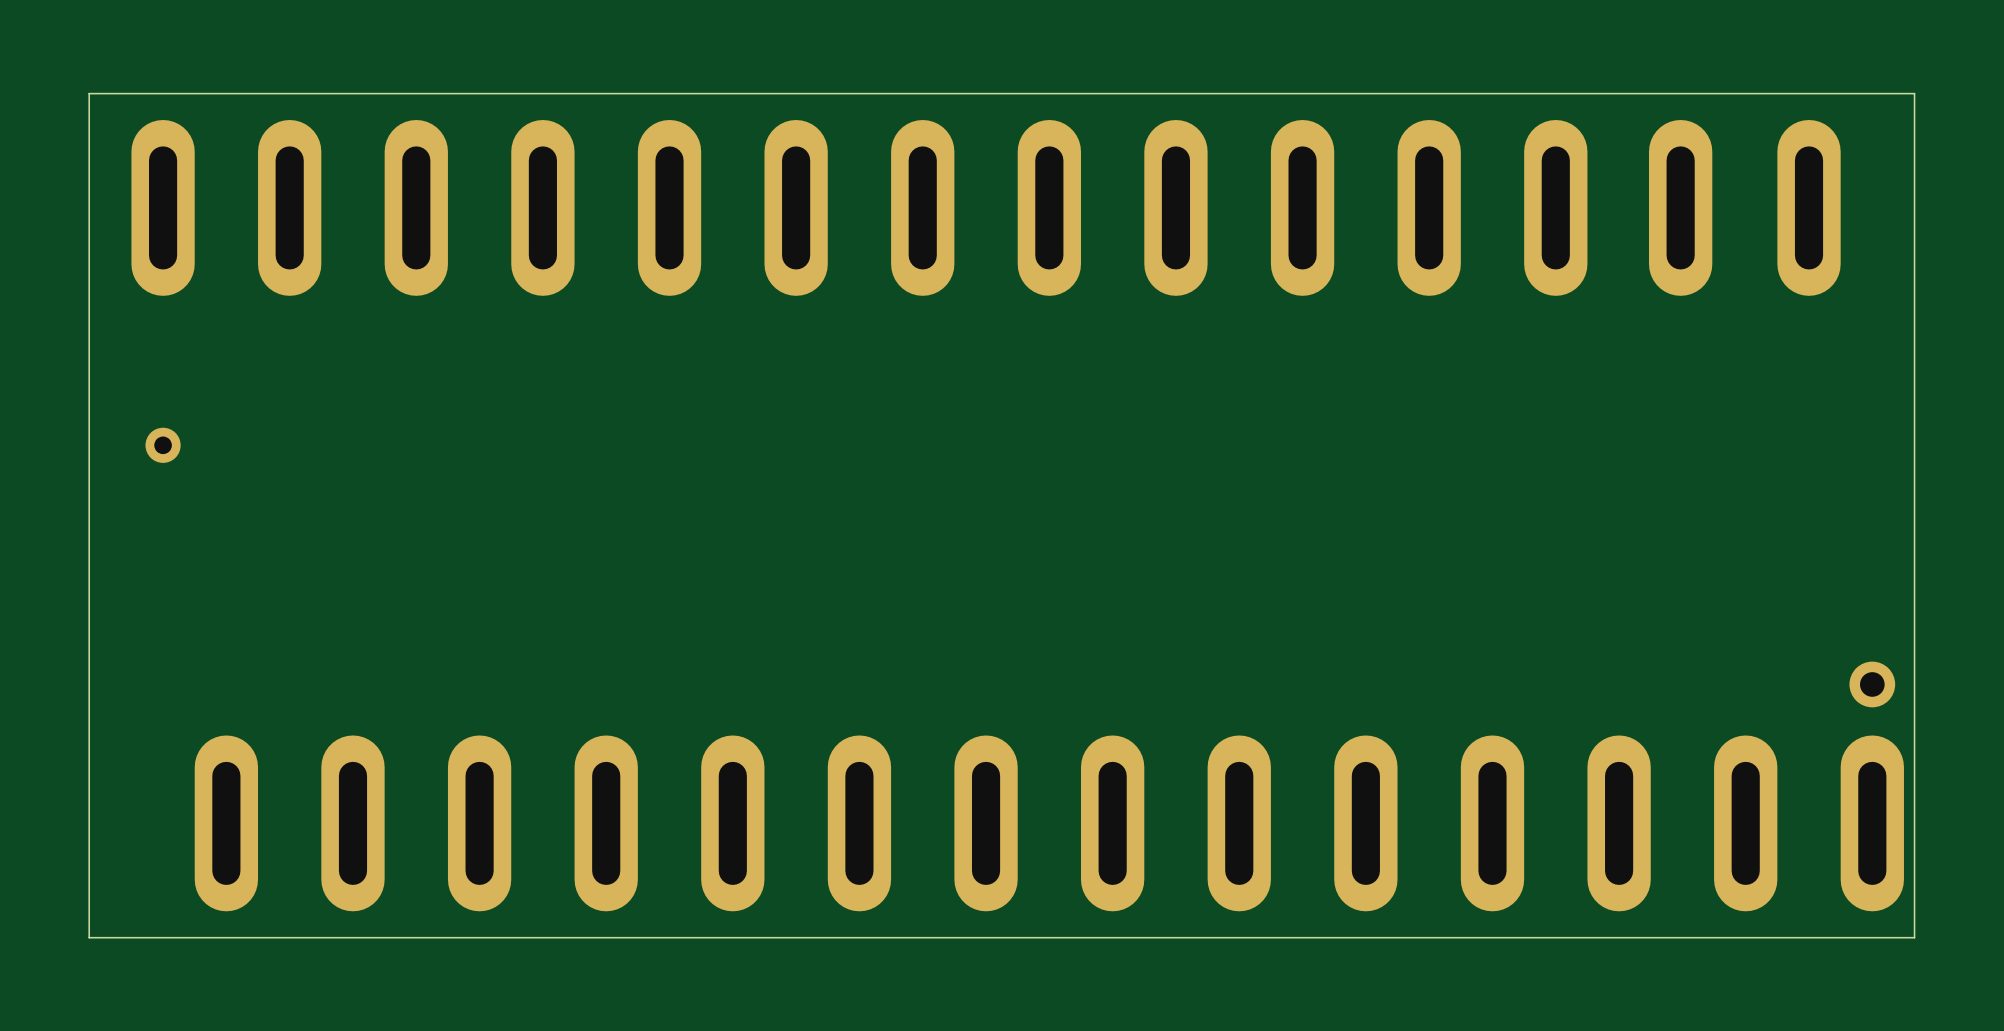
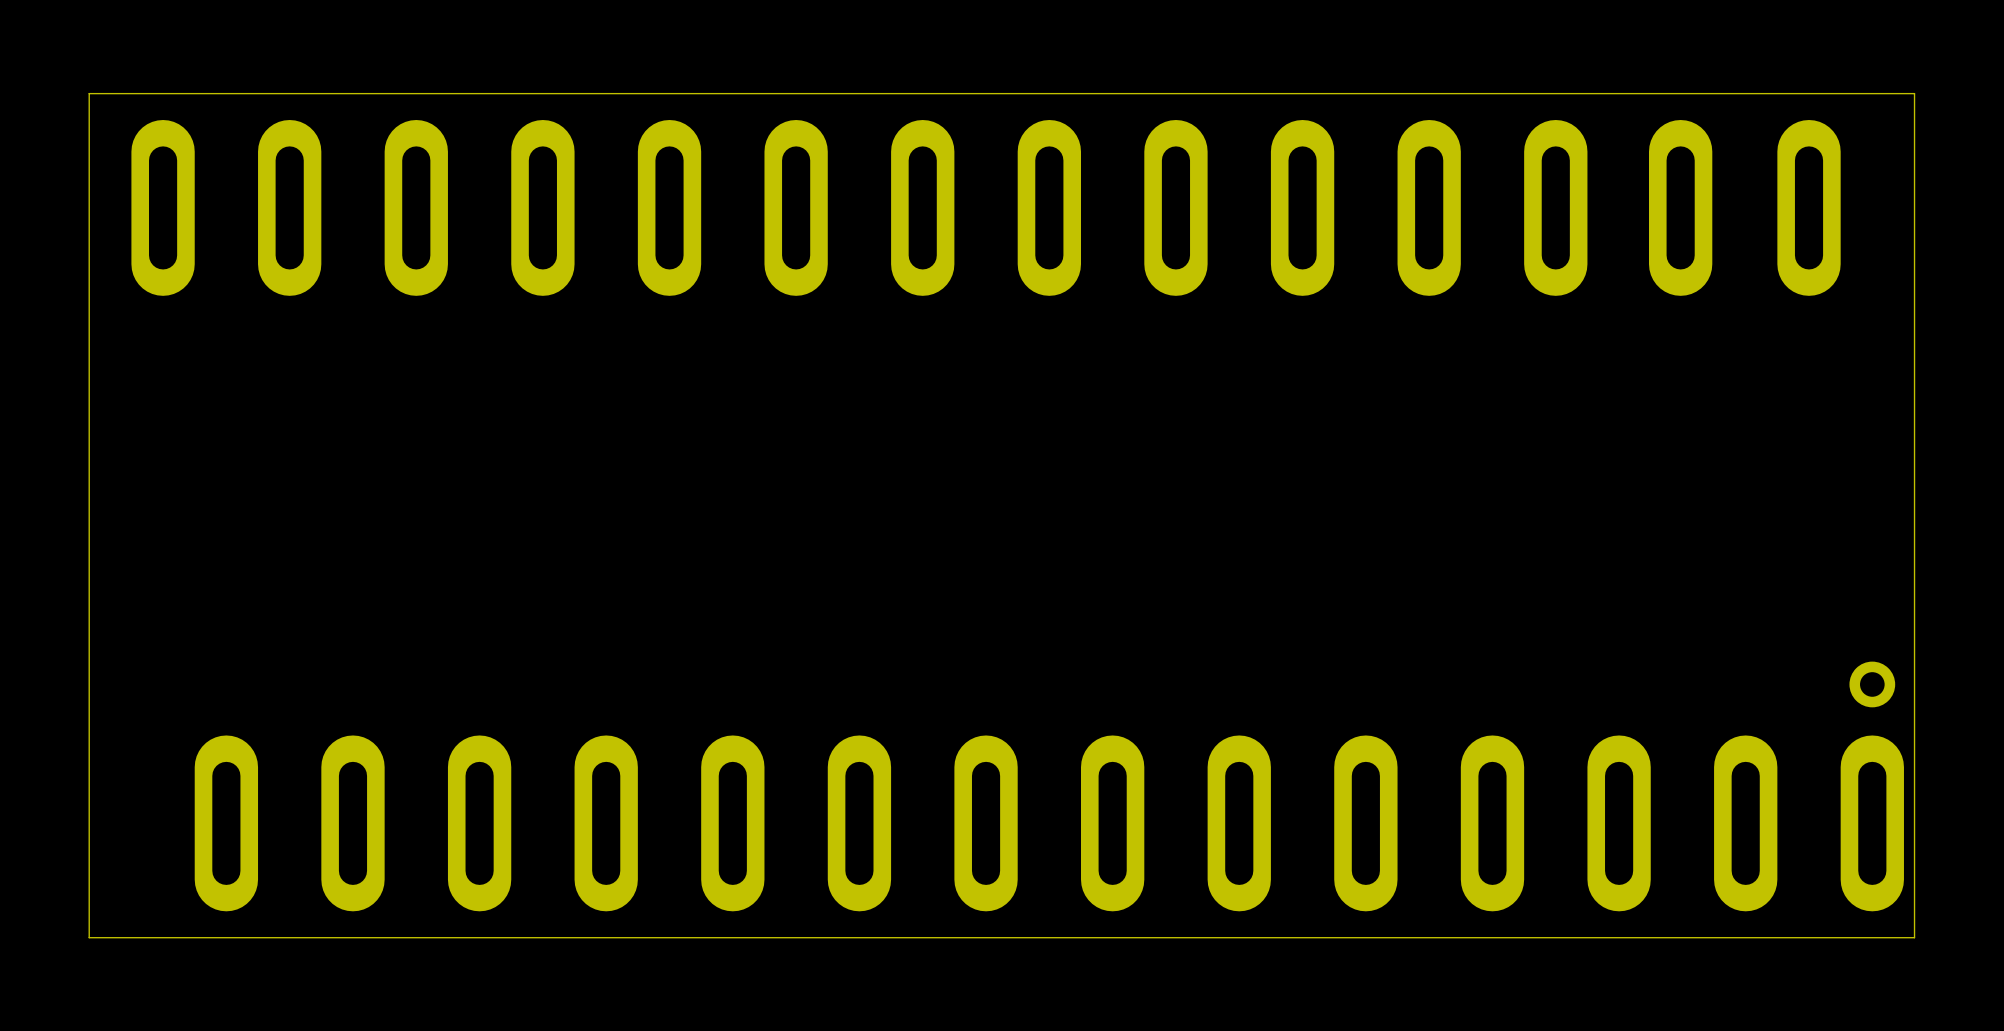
part: (163, 445) -> none

